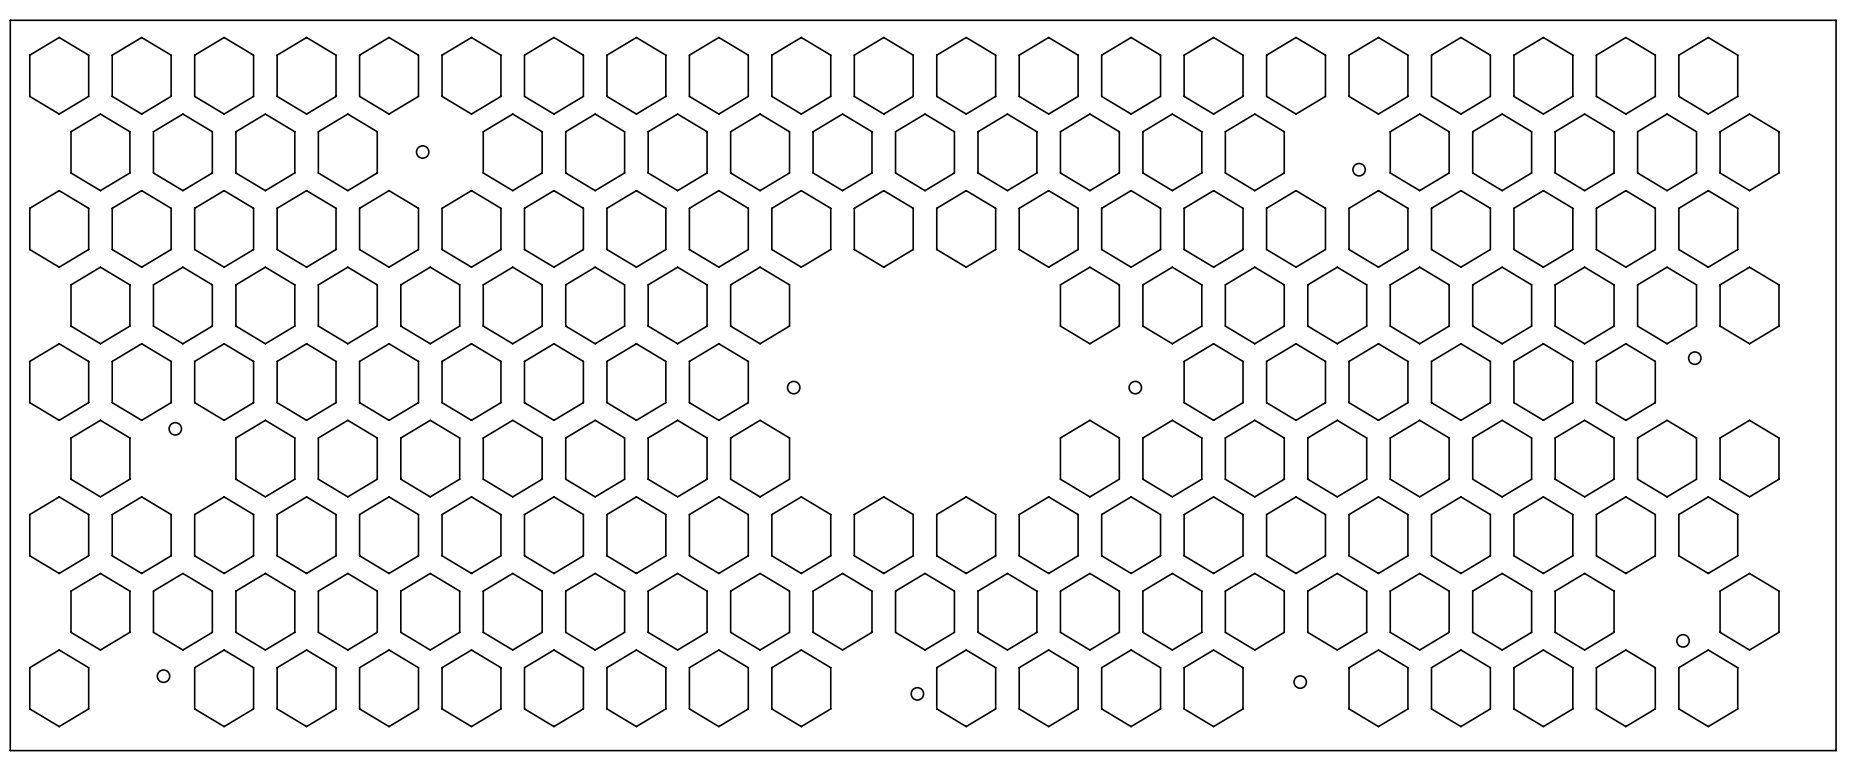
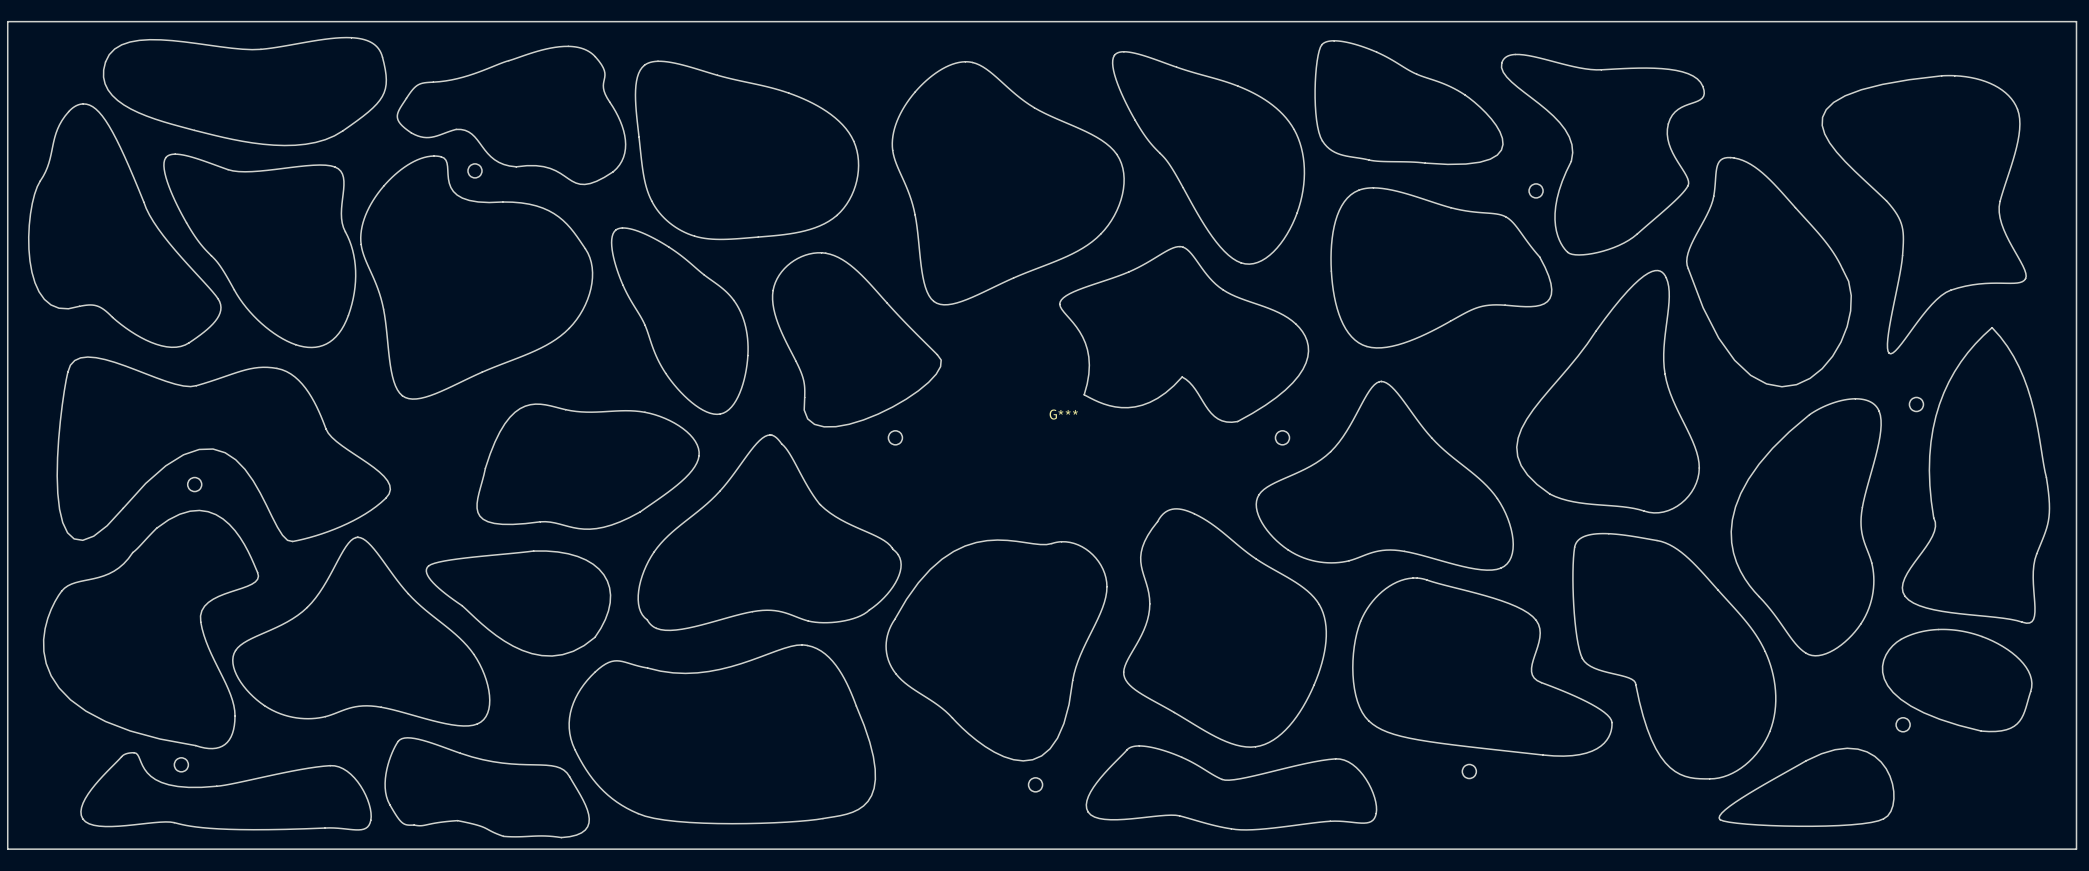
board edge: none -> (351, 37) (330, 38) (252, 49) (172, 40) (139, 40) (121, 44) (114, 48) (105, 62) (103, 77) (108, 89) (117, 100) (130, 109) (154, 119) (242, 141) (273, 145) (305, 144) (325, 139) (342, 130) (372, 107) (384, 92) (386, 74) (379, 50) (369, 41) (351, 37)
board edge: (59, 37) (29, 55) (29, 96) (59, 114) (88, 96) (88, 55) (59, 37) -> none
board edge: (141, 37) (112, 55) (112, 96) (141, 114) (171, 96) (171, 55) (141, 37) -> none
board edge: (224, 37) (194, 55) (194, 96) (224, 114) (253, 96) (253, 55) (224, 37) -> none
board edge: (306, 37) (336, 55) (336, 96) (306, 114) (277, 96) (277, 55) (306, 37) -> none
board edge: (389, 37) (359, 55) (359, 96) (389, 114) (418, 96) (418, 55) (389, 37) -> none
board edge: (471, 37) (442, 55) (442, 96) (471, 114) (500, 96) (500, 55) (471, 37) -> none
board edge: (553, 37) (524, 55) (524, 96) (553, 114) (583, 96) (583, 55) (553, 37) -> none
board edge: (636, 37) (606, 55) (606, 96) (636, 114) (665, 96) (665, 55) (636, 37) -> none
board edge: (718, 37) (748, 55) (748, 96) (718, 114) (689, 96) (689, 55) (718, 37) -> none
board edge: (801, 37) (830, 55) (830, 96) (801, 114) (771, 96) (771, 55) (801, 37) -> none
board edge: (883, 37) (913, 55) (913, 96) (883, 114) (854, 96) (854, 55) (883, 37) -> none
board edge: (966, 37) (936, 55) (936, 96) (966, 114) (995, 96) (995, 55) (966, 37) -> none
board edge: (1048, 37) (1078, 55) (1078, 96) (1048, 114) (1019, 96) (1019, 55) (1048, 37) -> none
board edge: (1131, 37) (1101, 55) (1101, 96) (1131, 114) (1160, 96) (1160, 55) (1131, 37) -> none
board edge: none -> (1334, 40) (1352, 43) (1374, 51) (1414, 73) (1447, 85) (1464, 94) (1480, 107) (1496, 125) (1502, 138) (1501, 150) (1490, 159) (1479, 162) (1447, 164) (1374, 160) (1343, 155) (1331, 150) (1322, 140) (1318, 132) (1315, 89) (1317, 61) (1320, 47) (1325, 42) (1334, 40)
board edge: (1213, 37) (1243, 55) (1243, 96) (1213, 114) (1184, 96) (1184, 55) (1213, 37) -> none
board edge: (1296, 37) (1325, 55) (1325, 96) (1296, 114) (1266, 96) (1266, 55) (1296, 37) -> none
board edge: (1378, 37) (1349, 55) (1349, 96) (1378, 114) (1407, 96) (1407, 55) (1378, 37) -> none
board edge: (1460, 37) (1490, 55) (1490, 96) (1460, 114) (1431, 96) (1431, 55) (1460, 37) -> none
board edge: (1543, 37) (1513, 55) (1513, 96) (1543, 114) (1572, 96) (1572, 55) (1543, 37) -> none
board edge: (1625, 37) (1655, 55) (1655, 96) (1625, 114) (1596, 96) (1596, 55) (1625, 37) -> none
board edge: (1708, 37) (1737, 55) (1737, 96) (1708, 114) (1678, 96) (1678, 55) (1708, 37) -> none
board edge: none -> (568, 46) (588, 51) (601, 64) (604, 72) (604, 90) (618, 116) (624, 135) (624, 153) (619, 164) (613, 171) (596, 181) (580, 184) (555, 170) (543, 166) (516, 166) (503, 164) (490, 156) (474, 136) (465, 130) (456, 129) (434, 136) (423, 137) (411, 132) (397, 119) (397, 114) (401, 105) (412, 89) (419, 84) (457, 78) (537, 51) (568, 46)
board edge: none -> (1123, 51) (1115, 54) (1112, 63) (1116, 79) (1123, 98) (1143, 133) (1171, 167) (1208, 231) (1224, 251) (1236, 261) (1249, 264) (1265, 258) (1277, 247) (1287, 234) (1295, 218) (1301, 196) (1304, 179) (1303, 157) (1298, 138) (1291, 125) (1272, 105) (1245, 89) (1144, 56) (1123, 51)
board edge: none -> (1515, 54) (1507, 56) (1503, 60) (1501, 67) (1503, 72) (1511, 81) (1559, 122) (1571, 144) (1571, 161) (1559, 190) (1555, 213) (1556, 231) (1562, 246) (1569, 253) (1583, 254) (1608, 249) (1628, 240) (1671, 204) (1688, 185) (1687, 178) (1670, 148) (1667, 129) (1670, 119) (1675, 111) (1702, 98) (1704, 90) (1700, 82) (1688, 73) (1669, 69) (1590, 69) (1515, 54)
board edge: none -> (658, 61) (647, 63) (640, 70) (635, 85) (635, 105) (646, 187) (655, 207) (669, 222) (687, 233) (704, 238) (727, 239) (768, 236) (794, 233) (814, 227) (832, 218) (843, 208) (855, 185) (858, 160) (851, 136) (835, 117) (812, 103) (784, 91) (678, 64) (658, 61)
board edge: none -> (965, 61) (976, 63) (986, 69) (1034, 107) (1085, 131) (1106, 143) (1119, 158) (1122, 168) (1124, 183) (1121, 199) (1111, 220) (1100, 234) (1087, 245) (1066, 256) (972, 297) (957, 302) (943, 304) (933, 301) (925, 287) (913, 209) (894, 157) (892, 139) (900, 113) (917, 88) (942, 68) (965, 61)
board edge: none -> (1954, 75) (1909, 79) (1861, 89) (1833, 102) (1826, 109) (1822, 117) (1822, 125) (1829, 142) (1845, 161) (1886, 200) (1901, 223) (1903, 236) (1902, 260) (1887, 338) (1888, 351) (1890, 353) (1898, 347) (1931, 304) (1946, 292) (1972, 284) (2020, 282) (2026, 276) (2022, 265) (2003, 229) (1999, 212) (2000, 201) (2017, 141) (2019, 123) (2017, 109) (2008, 95) (1994, 85) (1976, 78) (1954, 75)
board edge: none -> (83, 103) (71, 108) (59, 124) (47, 167) (34, 194) (28, 237) (29, 260) (34, 282) (44, 299) (51, 304) (68, 308) (86, 305) (96, 305) (130, 331) (151, 342) (171, 347) (185, 344) (203, 332) (215, 321) (220, 310) (219, 301) (158, 228) (146, 208) (124, 156) (109, 126) (95, 109) (83, 103)
board edge: (100, 114) (129, 131) (129, 172) (100, 190) (70, 172) (70, 131) (100, 114) -> none
board edge: (182, 114) (212, 131) (212, 172) (182, 190) (153, 172) (153, 131) (182, 114) -> none
board edge: (265, 114) (235, 131) (235, 172) (265, 190) (294, 172) (294, 131) (265, 114) -> none
board edge: (347, 114) (377, 131) (377, 172) (347, 190) (318, 172) (318, 131) (347, 114) -> none
board edge: (512, 114) (542, 131) (542, 172) (512, 190) (483, 172) (483, 131) (512, 114) -> none
board edge: (595, 114) (624, 131) (624, 172) (595, 190) (565, 172) (565, 131) (595, 114) -> none
board edge: (677, 114) (707, 131) (707, 172) (677, 190) (648, 172) (648, 131) (677, 114) -> none
board edge: (760, 114) (730, 131) (730, 172) (760, 190) (789, 172) (789, 131) (760, 114) -> none
board edge: (842, 114) (871, 131) (871, 172) (842, 190) (813, 172) (813, 131) (842, 114) -> none
board edge: (924, 114) (895, 131) (895, 172) (924, 190) (954, 172) (954, 131) (924, 114) -> none
board edge: (1007, 114) (977, 131) (977, 172) (1007, 190) (1036, 172) (1036, 131) (1007, 114) -> none
board edge: (1089, 114) (1060, 131) (1060, 172) (1089, 190) (1119, 172) (1119, 131) (1089, 114) -> none
board edge: (1172, 114) (1142, 131) (1142, 172) (1172, 190) (1201, 172) (1201, 131) (1172, 114) -> none
board edge: (1254, 114) (1284, 131) (1284, 172) (1254, 190) (1225, 172) (1225, 131) (1254, 114) -> none
board edge: (1419, 114) (1449, 131) (1449, 172) (1419, 190) (1390, 172) (1390, 131) (1419, 114) -> none
board edge: (1502, 114) (1531, 131) (1531, 172) (1502, 190) (1472, 172) (1472, 131) (1502, 114) -> none
board edge: (1584, 114) (1555, 131) (1555, 172) (1584, 190) (1614, 172) (1614, 131) (1584, 114) -> none
board edge: (1667, 114) (1696, 131) (1696, 172) (1667, 190) (1637, 172) (1637, 131) (1667, 114) -> none
board edge: (1749, 114) (1720, 131) (1720, 172) (1749, 190) (1778, 172) (1778, 131) (1749, 114) -> none
board edge: none -> (175, 154) (166, 156) (163, 165) (167, 181) (175, 200) (194, 235) (218, 264) (249, 311) (274, 333) (295, 344) (315, 347) (332, 339) (341, 329) (348, 315) (355, 281) (353, 255) (341, 218) (343, 181) (340, 171) (335, 167) (319, 165) (238, 171) (189, 156) (175, 154)
board edge: none -> (433, 156) (410, 163) (386, 183) (368, 207) (360, 233) (362, 251) (382, 303) (393, 381) (402, 395) (412, 399) (425, 397) (440, 391) (535, 350) (555, 339) (569, 328) (579, 314) (589, 294) (592, 277) (591, 262) (587, 253) (573, 232) (558, 216) (542, 208) (529, 204) (478, 201) (462, 198) (450, 187) (445, 160) (441, 156) (433, 156)
board edge: none -> (1730, 157) (1722, 158) (1718, 163) (1712, 200) (1689, 248) (1687, 265) (1703, 307) (1718, 338) (1734, 360) (1750, 375) (1766, 383) (1781, 386) (1796, 384) (1810, 378) (1822, 368) (1841, 342) (1850, 310) (1851, 295) (1848, 281) (1827, 244) (1773, 183) (1750, 164) (1730, 157)
board edge: none -> (1373, 187) (1358, 190) (1344, 201) (1335, 220) (1331, 244) (1331, 277) (1337, 308) (1345, 328) (1358, 342) (1371, 347) (1392, 346) (1420, 336) (1479, 306) (1496, 304) (1535, 306) (1544, 303) (1549, 298) (1550, 283) (1539, 257) (1507, 217) (1496, 213) (1456, 209) (1397, 191) (1373, 187)
board edge: (59, 190) (88, 208) (88, 249) (59, 267) (29, 249) (29, 208) (59, 190) -> none
board edge: (141, 190) (171, 208) (171, 249) (141, 267) (112, 249) (112, 208) (141, 190) -> none
board edge: (224, 190) (253, 208) (253, 249) (224, 267) (194, 249) (194, 208) (224, 190) -> none
board edge: (306, 190) (336, 208) (336, 249) (306, 267) (277, 249) (277, 208) (306, 190) -> none
board edge: (389, 190) (418, 208) (418, 249) (389, 267) (359, 249) (359, 208) (389, 190) -> none
board edge: (471, 190) (500, 208) (500, 249) (471, 267) (442, 249) (442, 208) (471, 190) -> none
board edge: (553, 190) (583, 208) (583, 249) (553, 267) (524, 249) (524, 208) (553, 190) -> none
board edge: (636, 190) (665, 208) (665, 249) (636, 267) (606, 249) (606, 208) (636, 190) -> none
board edge: (718, 190) (689, 208) (689, 249) (718, 267) (748, 249) (748, 208) (718, 190) -> none
board edge: (801, 190) (771, 208) (771, 249) (801, 267) (830, 249) (830, 208) (801, 190) -> none
board edge: (883, 190) (854, 208) (854, 249) (883, 267) (913, 249) (913, 208) (883, 190) -> none
board edge: (966, 190) (995, 208) (995, 249) (966, 267) (936, 249) (936, 208) (966, 190) -> none
board edge: (1048, 190) (1078, 208) (1078, 249) (1048, 267) (1019, 249) (1019, 208) (1048, 190) -> none
board edge: (1131, 190) (1101, 208) (1101, 249) (1131, 267) (1160, 249) (1160, 208) (1131, 190) -> none
board edge: (1213, 190) (1184, 208) (1184, 249) (1213, 267) (1243, 249) (1243, 208) (1213, 190) -> none
board edge: (1296, 190) (1325, 208) (1325, 249) (1296, 267) (1266, 249) (1266, 208) (1296, 190) -> none
board edge: (1378, 190) (1407, 208) (1407, 249) (1378, 267) (1349, 249) (1349, 208) (1378, 190) -> none
board edge: (1460, 190) (1490, 208) (1490, 249) (1460, 267) (1431, 249) (1431, 208) (1460, 190) -> none
board edge: (1543, 190) (1513, 208) (1513, 249) (1543, 267) (1572, 249) (1572, 208) (1543, 190) -> none
board edge: (1625, 190) (1596, 208) (1596, 249) (1625, 267) (1655, 249) (1655, 208) (1625, 190) -> none
board edge: (1708, 190) (1678, 208) (1678, 249) (1708, 267) (1737, 249) (1737, 208) (1708, 190) -> none
board edge: none -> (622, 227) (615, 230) (612, 236) (614, 261) (623, 285) (644, 323) (661, 366) (677, 388) (695, 405) (713, 414) (726, 411) (733, 404) (739, 392) (746, 365) (747, 334) (738, 308) (725, 290) (674, 251) (644, 233) (622, 227)
board edge: none -> (1179, 246) (1168, 250) (1128, 271) (1073, 291) (1061, 299) (1060, 306) (1079, 331) (1087, 349) (1088, 374) (1084, 394) (1109, 405) (1135, 406) (1157, 398) (1182, 377) (1192, 385) (1214, 416) (1226, 421) (1237, 421) (1265, 405) (1292, 382) (1306, 362) (1308, 351) (1307, 340) (1299, 327) (1287, 317) (1269, 308) (1235, 296) (1219, 287) (1189, 251) (1179, 246)
board edge: none -> (821, 252) (838, 257) (857, 271) (941, 360) (940, 366) (936, 374) (906, 399) (863, 419) (835, 426) (814, 424) (807, 418) (804, 410) (802, 377) (779, 328) (772, 299) (775, 282) (787, 265) (805, 255) (821, 252)
board edge: none -> (1666, 277) (1669, 296) (1664, 347) (1665, 374) (1670, 393) (1698, 457) (1698, 473) (1694, 487) (1688, 496) (1677, 506) (1658, 512) (1579, 502) (1550, 494) (1537, 484) (1521, 465) (1516, 447) (1521, 428) (1533, 409) (1577, 356) (1627, 291) (1639, 279) (1651, 271) (1660, 271) (1666, 277)
board edge: (100, 267) (129, 284) (129, 326) (100, 343) (70, 326) (70, 284) (100, 267) -> none
board edge: (182, 267) (153, 284) (153, 326) (182, 343) (212, 326) (212, 284) (182, 267) -> none
board edge: (265, 267) (294, 284) (294, 326) (265, 343) (235, 326) (235, 284) (265, 267) -> none
board edge: (347, 267) (377, 284) (377, 326) (347, 343) (318, 326) (318, 284) (347, 267) -> none
board edge: (430, 267) (459, 284) (459, 326) (430, 343) (400, 326) (400, 284) (430, 267) -> none
board edge: (512, 267) (483, 284) (483, 326) (512, 343) (542, 326) (542, 284) (512, 267) -> none
board edge: (595, 267) (624, 284) (624, 326) (595, 343) (565, 326) (565, 284) (595, 267) -> none
board edge: (677, 267) (648, 284) (648, 326) (677, 343) (707, 326) (707, 284) (677, 267) -> none
board edge: (760, 267) (789, 284) (789, 326) (760, 343) (730, 326) (730, 284) (760, 267) -> none
board edge: (1089, 267) (1119, 284) (1119, 326) (1089, 343) (1060, 326) (1060, 284) (1089, 267) -> none
board edge: (1172, 267) (1201, 284) (1201, 326) (1172, 343) (1142, 326) (1142, 284) (1172, 267) -> none
board edge: (1254, 267) (1225, 284) (1225, 326) (1254, 343) (1284, 326) (1284, 284) (1254, 267) -> none
board edge: (1337, 267) (1366, 284) (1366, 326) (1337, 343) (1307, 326) (1307, 284) (1337, 267) -> none
board edge: (1419, 267) (1390, 284) (1390, 326) (1419, 343) (1449, 326) (1449, 284) (1419, 267) -> none
board edge: (1502, 267) (1531, 284) (1531, 326) (1502, 343) (1472, 326) (1472, 284) (1502, 267) -> none
board edge: (1584, 267) (1614, 284) (1614, 326) (1584, 343) (1555, 326) (1555, 284) (1584, 267) -> none
board edge: (1667, 267) (1637, 284) (1637, 326) (1667, 343) (1696, 326) (1696, 284) (1667, 267) -> none
board edge: (1749, 267) (1778, 284) (1778, 326) (1749, 343) (1720, 326) (1720, 284) (1749, 267) -> none
board edge: none -> (1992, 327) (1960, 361) (1948, 381) (1939, 404) (1933, 428) (1929, 456) (1929, 485) (1935, 526) (1929, 541) (1907, 573) (1902, 587) (1905, 596) (1908, 599) (1926, 607) (2029, 622) (2033, 619) (2034, 611) (2033, 565) (2048, 517) (2048, 491) (2036, 419) (2027, 388) (2013, 356) (1992, 327)
board edge: none -> (276, 368) (250, 368) (190, 386) (166, 381) (105, 359) (87, 357) (74, 360) (70, 365) (66, 379) (57, 457) (59, 509) (67, 532) (74, 538) (82, 540) (93, 536) (107, 525) (145, 483) (165, 465) (183, 454) (199, 449) (213, 449) (225, 452) (235, 459) (253, 480) (277, 527) (287, 540) (298, 540) (328, 531) (353, 520) (376, 506) (389, 493) (390, 489) (387, 480) (373, 467) (331, 437) (305, 388) (290, 373) (276, 368)
board edge: none -> (1381, 381) (1374, 384) (1369, 390) (1346, 431) (1330, 451) (1310, 466) (1270, 484) (1261, 492) (1257, 497) (1256, 507) (1264, 526) (1273, 537) (1287, 549) (1303, 557) (1319, 562) (1342, 562) (1375, 551) (1390, 550) (1410, 552) (1475, 568) (1492, 570) (1504, 566) (1511, 557) (1512, 539) (1507, 518) (1497, 498) (1483, 482) (1435, 442) (1394, 390) (1381, 381)
board edge: (59, 343) (29, 361) (29, 402) (59, 420) (88, 402) (88, 361) (59, 343) -> none
board edge: (141, 343) (112, 361) (112, 402) (141, 420) (171, 402) (171, 361) (141, 343) -> none
board edge: (224, 343) (194, 361) (194, 402) (224, 420) (253, 402) (253, 361) (224, 343) -> none
board edge: (306, 343) (277, 361) (277, 402) (306, 420) (336, 402) (336, 361) (306, 343) -> none
board edge: (389, 343) (418, 361) (418, 402) (389, 420) (359, 402) (359, 361) (389, 343) -> none
board edge: (471, 343) (500, 361) (500, 402) (471, 420) (442, 402) (442, 361) (471, 343) -> none
board edge: (553, 343) (583, 361) (583, 402) (553, 420) (524, 402) (524, 361) (553, 343) -> none
board edge: (636, 343) (665, 361) (665, 402) (636, 420) (606, 402) (606, 361) (636, 343) -> none
board edge: (718, 343) (689, 361) (689, 402) (718, 420) (748, 402) (748, 361) (718, 343) -> none
board edge: (1213, 343) (1243, 361) (1243, 402) (1213, 420) (1184, 402) (1184, 361) (1213, 343) -> none
board edge: (1296, 343) (1266, 361) (1266, 402) (1296, 420) (1325, 402) (1325, 361) (1296, 343) -> none
board edge: (1378, 343) (1349, 361) (1349, 402) (1378, 420) (1407, 402) (1407, 361) (1378, 343) -> none
board edge: (1460, 343) (1431, 361) (1431, 402) (1460, 420) (1490, 402) (1490, 361) (1460, 343) -> none
board edge: (1543, 343) (1513, 361) (1513, 402) (1543, 420) (1572, 402) (1572, 361) (1543, 343) -> none
board edge: (1625, 343) (1655, 361) (1655, 402) (1625, 420) (1596, 402) (1596, 361) (1625, 343) -> none
board edge: none -> (1855, 398) (1838, 401) (1820, 408) (1789, 431) (1772, 448) (1748, 479) (1740, 493) (1732, 519) (1731, 531) (1733, 553) (1744, 578) (1795, 643) (1802, 651) (1811, 655) (1829, 652) (1851, 635) (1865, 616) (1873, 592) (1873, 569) (1862, 536) (1861, 517) (1878, 442) (1881, 420) (1879, 411) (1874, 404) (1866, 400) (1855, 398)
board edge: none -> (565, 409) (545, 404) (530, 404) (515, 412) (504, 423) (490, 454) (479, 492) (477, 508) (483, 519) (502, 524) (545, 521) (584, 529) (603, 527) (629, 517) (663, 495) (688, 474) (698, 459) (698, 448) (689, 434) (678, 425) (660, 416) (635, 411) (586, 412) (565, 409)
G***: none -> (1063, 414)
board edge: none -> (770, 435) (759, 440) (719, 491) (668, 535) (651, 556) (640, 580) (638, 599) (642, 614) (654, 627) (665, 630) (682, 629) (747, 612) (767, 610) (781, 611) (815, 622) (845, 620) (866, 612) (884, 597) (895, 582) (901, 564) (896, 553) (884, 540) (840, 519) (820, 505) (787, 450) (776, 438) (770, 435)
board edge: (100, 420) (129, 437) (129, 479) (100, 496) (70, 479) (70, 437) (100, 420) -> none
board edge: (265, 420) (294, 437) (294, 479) (265, 496) (235, 479) (235, 437) (265, 420) -> none
board edge: (347, 420) (377, 437) (377, 479) (347, 496) (318, 479) (318, 437) (347, 420) -> none
board edge: (430, 420) (459, 437) (459, 479) (430, 496) (400, 479) (400, 437) (430, 420) -> none
board edge: (512, 420) (542, 437) (542, 479) (512, 496) (483, 479) (483, 437) (512, 420) -> none
board edge: (595, 420) (565, 437) (565, 479) (595, 496) (624, 479) (624, 437) (595, 420) -> none
board edge: (677, 420) (707, 437) (707, 479) (677, 496) (648, 479) (648, 437) (677, 420) -> none
board edge: (760, 420) (730, 437) (730, 479) (760, 496) (789, 479) (789, 437) (760, 420) -> none
board edge: (1089, 420) (1119, 437) (1119, 479) (1089, 496) (1060, 479) (1060, 437) (1089, 420) -> none
board edge: (1172, 420) (1201, 437) (1201, 479) (1172, 496) (1142, 479) (1142, 437) (1172, 420) -> none
board edge: (1254, 420) (1284, 437) (1284, 479) (1254, 496) (1225, 479) (1225, 437) (1254, 420) -> none
board edge: (1337, 420) (1366, 437) (1366, 479) (1337, 496) (1307, 479) (1307, 437) (1337, 420) -> none
board edge: (1419, 420) (1390, 437) (1390, 479) (1419, 496) (1449, 479) (1449, 437) (1419, 420) -> none
board edge: (1502, 420) (1531, 437) (1531, 479) (1502, 496) (1472, 479) (1472, 437) (1502, 420) -> none
board edge: (1584, 420) (1555, 437) (1555, 479) (1584, 496) (1614, 479) (1614, 437) (1584, 420) -> none
board edge: (1667, 420) (1637, 437) (1637, 479) (1667, 496) (1696, 479) (1696, 437) (1667, 420) -> none
board edge: (1749, 420) (1778, 437) (1778, 479) (1749, 496) (1720, 479) (1720, 437) (1749, 420) -> none
board edge: none -> (1194, 513) (1215, 526) (1256, 559) (1303, 587) (1316, 600) (1324, 617) (1326, 631) (1324, 652) (1318, 674) (1308, 696) (1296, 716) (1285, 729) (1273, 739) (1260, 745) (1241, 746) (1215, 736) (1138, 692) (1129, 685) (1124, 677) (1125, 665) (1143, 630) (1149, 609) (1148, 593) (1140, 561) (1144, 541) (1161, 516) (1167, 510) (1179, 509) (1194, 513)
board edge: none -> (156, 528) (168, 519) (190, 511) (199, 510) (215, 514) (229, 524) (240, 537) (257, 572) (258, 576) (255, 581) (213, 599) (204, 606) (200, 615) (206, 641) (228, 689) (234, 710) (232, 733) (227, 742) (219, 747) (204, 747) (160, 739) (105, 721) (70, 699) (59, 688) (46, 663) (43, 651) (45, 628) (51, 609) (61, 591) (71, 584) (98, 577) (113, 571) (123, 563) (156, 528)
board edge: none -> (1608, 533) (1661, 541) (1677, 549) (1696, 566) (1738, 612) (1763, 647) (1770, 665) (1774, 685) (1775, 706) (1773, 721) (1767, 736) (1759, 749) (1745, 765) (1732, 773) (1718, 777) (1700, 778) (1685, 776) (1675, 771) (1660, 756) (1651, 739) (1634, 680) (1594, 668) (1582, 658) (1578, 643) (1574, 613) (1572, 572) (1574, 547) (1577, 541) (1583, 536) (1608, 533)
board edge: none -> (357, 537) (371, 545) (412, 598) (459, 637) (473, 654) (484, 674) (489, 695) (487, 713) (480, 722) (468, 725) (451, 724) (386, 708) (366, 705) (352, 707) (318, 717) (296, 717) (280, 713) (264, 705) (249, 693) (240, 682) (232, 663) (234, 653) (237, 647) (247, 640) (287, 621) (307, 607) (323, 587) (345, 546) (350, 540) (357, 537)
board edge: none -> (1061, 541) (1078, 544) (1095, 558) (1105, 577) (1105, 597) (1075, 667) (1069, 704) (1057, 738) (1050, 748) (1041, 755) (1032, 759) (1013, 759) (985, 746) (941, 708) (901, 680) (888, 660) (886, 649) (887, 635) (892, 622) (918, 582) (930, 569) (953, 551) (965, 545) (987, 540) (1007, 540) (1040, 544) (1061, 541)
board edge: none -> (533, 551) (557, 551) (577, 556) (593, 564) (607, 581) (610, 602) (605, 619) (594, 637) (573, 651) (562, 654) (541, 655) (513, 646) (488, 629) (439, 588) (429, 577) (426, 571) (430, 564) (444, 560) (533, 551)
board edge: (59, 496) (88, 514) (88, 555) (59, 573) (29, 555) (29, 514) (59, 496) -> none
board edge: (141, 496) (171, 514) (171, 555) (141, 573) (112, 555) (112, 514) (141, 496) -> none
board edge: (224, 496) (194, 514) (194, 555) (224, 573) (253, 555) (253, 514) (224, 496) -> none
board edge: (306, 496) (277, 514) (277, 555) (306, 573) (336, 555) (336, 514) (306, 496) -> none
board edge: (389, 496) (359, 514) (359, 555) (389, 573) (418, 555) (418, 514) (389, 496) -> none
board edge: (471, 496) (442, 514) (442, 555) (471, 573) (500, 555) (500, 514) (471, 496) -> none
board edge: (553, 496) (583, 514) (583, 555) (553, 573) (524, 555) (524, 514) (553, 496) -> none
board edge: (636, 496) (665, 514) (665, 555) (636, 573) (606, 555) (606, 514) (636, 496) -> none
board edge: (718, 496) (748, 514) (748, 555) (718, 573) (689, 555) (689, 514) (718, 496) -> none
board edge: (801, 496) (771, 514) (771, 555) (801, 573) (830, 555) (830, 514) (801, 496) -> none
board edge: (883, 496) (913, 514) (913, 555) (883, 573) (854, 555) (854, 514) (883, 496) -> none
board edge: (966, 496) (995, 514) (995, 555) (966, 573) (936, 555) (936, 514) (966, 496) -> none
board edge: (1048, 496) (1078, 514) (1078, 555) (1048, 573) (1019, 555) (1019, 514) (1048, 496) -> none
board edge: (1131, 496) (1160, 514) (1160, 555) (1131, 573) (1101, 555) (1101, 514) (1131, 496) -> none
board edge: (1213, 496) (1243, 514) (1243, 555) (1213, 573) (1184, 555) (1184, 514) (1213, 496) -> none
board edge: (1296, 496) (1266, 514) (1266, 555) (1296, 573) (1325, 555) (1325, 514) (1296, 496) -> none
board edge: (1378, 496) (1407, 514) (1407, 555) (1378, 573) (1349, 555) (1349, 514) (1378, 496) -> none
board edge: (1460, 496) (1490, 514) (1490, 555) (1460, 573) (1431, 555) (1431, 514) (1460, 496) -> none
board edge: (1543, 496) (1572, 514) (1572, 555) (1543, 573) (1513, 555) (1513, 514) (1543, 496) -> none
board edge: (1625, 496) (1655, 514) (1655, 555) (1625, 573) (1596, 555) (1596, 514) (1625, 496) -> none
board edge: (1708, 496) (1737, 514) (1737, 555) (1708, 573) (1678, 555) (1678, 514) (1708, 496) -> none
board edge: none -> (1412, 578) (1397, 582) (1378, 594) (1364, 613) (1356, 633) (1352, 660) (1354, 688) (1362, 712) (1372, 724) (1387, 732) (1418, 739) (1553, 755) (1586, 753) (1596, 748) (1606, 740) (1612, 725) (1607, 715) (1586, 701) (1537, 680) (1532, 675) (1532, 664) (1540, 633) (1538, 624) (1532, 616) (1516, 606) (1493, 598) (1423, 579) (1412, 578)
board edge: none -> (1938, 629) (1962, 631) (1987, 638) (2007, 649) (2023, 663) (2030, 675) (2031, 687) (2024, 711) (2017, 723) (2001, 730) (1981, 731) (1923, 712) (1910, 706) (1893, 692) (1887, 685) (1882, 672) (1883, 660) (1889, 650) (1896, 642) (1909, 635) (1938, 629)
board edge: none -> (802, 644) (784, 648) (730, 666) (697, 672) (673, 672) (619, 661) (608, 662) (587, 680) (573, 702) (569, 728) (574, 749) (589, 774) (607, 795) (632, 811) (654, 818) (703, 823) (760, 823) (816, 819) (852, 812) (868, 801) (874, 788) (875, 769) (869, 742) (851, 692) (838, 669) (821, 651) (802, 644)
board edge: (100, 573) (129, 591) (129, 632) (100, 650) (70, 632) (70, 591) (100, 573) -> none
board edge: (182, 573) (153, 591) (153, 632) (182, 650) (212, 632) (212, 591) (182, 573) -> none
board edge: (265, 573) (294, 591) (294, 632) (265, 650) (235, 632) (235, 591) (265, 573) -> none
board edge: (347, 573) (377, 591) (377, 632) (347, 650) (318, 632) (318, 591) (347, 573) -> none
board edge: (430, 573) (459, 591) (459, 632) (430, 650) (400, 632) (400, 591) (430, 573) -> none
board edge: (512, 573) (542, 591) (542, 632) (512, 650) (483, 632) (483, 591) (512, 573) -> none
board edge: (595, 573) (565, 591) (565, 632) (595, 650) (624, 632) (624, 591) (595, 573) -> none
board edge: (677, 573) (707, 591) (707, 632) (677, 650) (648, 632) (648, 591) (677, 573) -> none
board edge: (760, 573) (789, 591) (789, 632) (760, 650) (730, 632) (730, 591) (760, 573) -> none
board edge: (842, 573) (813, 591) (813, 632) (842, 650) (871, 632) (871, 591) (842, 573) -> none
board edge: (924, 573) (895, 591) (895, 632) (924, 650) (954, 632) (954, 591) (924, 573) -> none
board edge: (1007, 573) (977, 591) (977, 632) (1007, 650) (1036, 632) (1036, 591) (1007, 573) -> none
board edge: (1089, 573) (1119, 591) (1119, 632) (1089, 650) (1060, 632) (1060, 591) (1089, 573) -> none
board edge: (1172, 573) (1201, 591) (1201, 632) (1172, 650) (1142, 632) (1142, 591) (1172, 573) -> none
board edge: (1254, 573) (1225, 591) (1225, 632) (1254, 650) (1284, 632) (1284, 591) (1254, 573) -> none
board edge: (1337, 573) (1307, 591) (1307, 632) (1337, 650) (1366, 632) (1366, 591) (1337, 573) -> none
board edge: (1419, 573) (1449, 591) (1449, 632) (1419, 650) (1390, 632) (1390, 591) (1419, 573) -> none
board edge: (1502, 573) (1531, 591) (1531, 632) (1502, 650) (1472, 632) (1472, 591) (1502, 573) -> none
board edge: (1584, 573) (1614, 591) (1614, 632) (1584, 650) (1555, 632) (1555, 591) (1584, 573) -> none
board edge: (1749, 573) (1778, 591) (1778, 632) (1749, 650) (1720, 632) (1720, 591) (1749, 573) -> none
board edge: (59, 650) (29, 667) (29, 708) (59, 726) (88, 708) (88, 667) (59, 650) -> none
board edge: (224, 650) (253, 667) (253, 708) (224, 726) (194, 708) (194, 667) (224, 650) -> none
board edge: (306, 650) (277, 667) (277, 708) (306, 726) (336, 708) (336, 667) (306, 650) -> none
board edge: (389, 650) (359, 667) (359, 708) (389, 726) (418, 708) (418, 667) (389, 650) -> none
board edge: (471, 650) (442, 667) (442, 708) (471, 726) (500, 708) (500, 667) (471, 650) -> none
board edge: (553, 650) (583, 667) (583, 708) (553, 726) (524, 708) (524, 667) (553, 650) -> none
board edge: (636, 650) (665, 667) (665, 708) (636, 726) (606, 708) (606, 667) (636, 650) -> none
board edge: (718, 650) (748, 667) (748, 708) (718, 726) (689, 708) (689, 667) (718, 650) -> none
board edge: (801, 650) (771, 667) (771, 708) (801, 726) (830, 708) (830, 667) (801, 650) -> none
board edge: (966, 650) (936, 667) (936, 708) (966, 726) (995, 708) (995, 667) (966, 650) -> none
board edge: (1048, 650) (1078, 667) (1078, 708) (1048, 726) (1019, 708) (1019, 667) (1048, 650) -> none
board edge: (1131, 650) (1160, 667) (1160, 708) (1131, 726) (1101, 708) (1101, 667) (1131, 650) -> none
board edge: (1213, 650) (1184, 667) (1184, 708) (1213, 726) (1243, 708) (1243, 667) (1213, 650) -> none
board edge: (1378, 650) (1407, 667) (1407, 708) (1378, 726) (1349, 708) (1349, 667) (1378, 650) -> none
board edge: (1460, 650) (1431, 667) (1431, 708) (1460, 726) (1490, 708) (1490, 667) (1460, 650) -> none
board edge: (1543, 650) (1513, 667) (1513, 708) (1543, 726) (1572, 708) (1572, 667) (1543, 650) -> none
board edge: (1625, 650) (1596, 667) (1596, 708) (1625, 726) (1655, 708) (1655, 667) (1625, 650) -> none
board edge: (1708, 650) (1678, 667) (1678, 708) (1708, 726) (1737, 708) (1737, 667) (1708, 650) -> none
board edge: none -> (398, 741) (387, 764) (385, 787) (389, 804) (398, 818) (404, 824) (421, 825) (457, 820) (479, 825) (503, 836) (561, 837) (576, 835) (587, 826) (589, 818) (585, 804) (569, 776) (560, 768) (482, 759) (414, 738) (404, 738) (398, 741)
board edge: none -> (1139, 745) (1127, 748) (1093, 787) (1086, 804) (1090, 814) (1110, 819) (1175, 815) (1220, 826) (1246, 829) (1330, 821) (1366, 822) (1372, 820) (1375, 816) (1375, 802) (1368, 783) (1356, 767) (1344, 760) (1321, 760) (1247, 777) (1225, 780) (1176, 755) (1154, 748) (1139, 745)
board edge: none -> (133, 752) (122, 755) (88, 794) (80, 811) (85, 821) (105, 826) (165, 821) (202, 827) (253, 829) (329, 827) (358, 829) (365, 828) (370, 823) (370, 808) (363, 790) (350, 774) (338, 766) (316, 767) (225, 785) (188, 787) (168, 784) (155, 779) (147, 772) (137, 754) (133, 752)
board edge: none -> (1806, 760) (1821, 753) (1847, 748) (1857, 749) (1874, 756) (1886, 768) (1892, 783) (1893, 798) (1890, 811) (1887, 815) (1878, 820) (1838, 825) (1758, 824) (1720, 819) (1721, 813) (1735, 802) (1806, 760)

